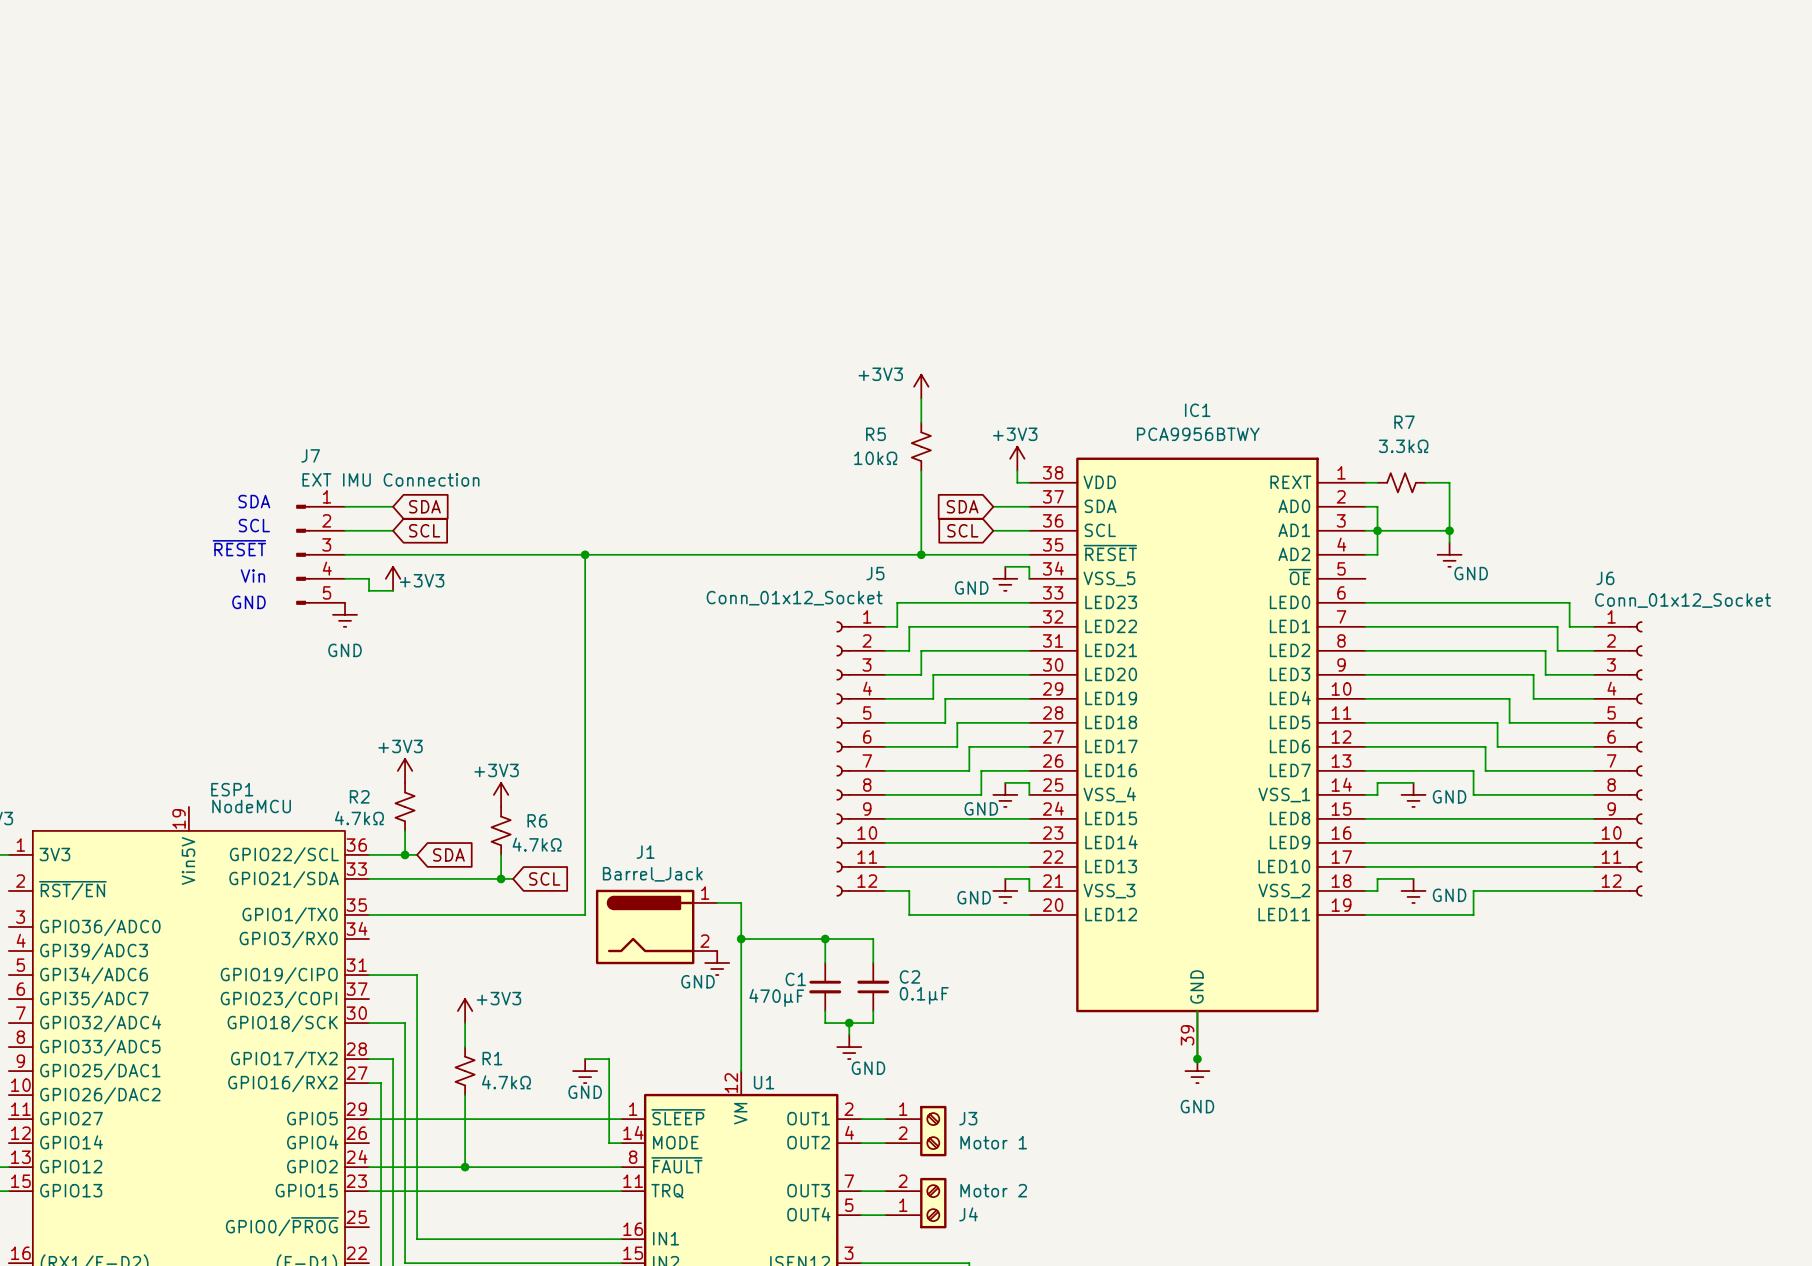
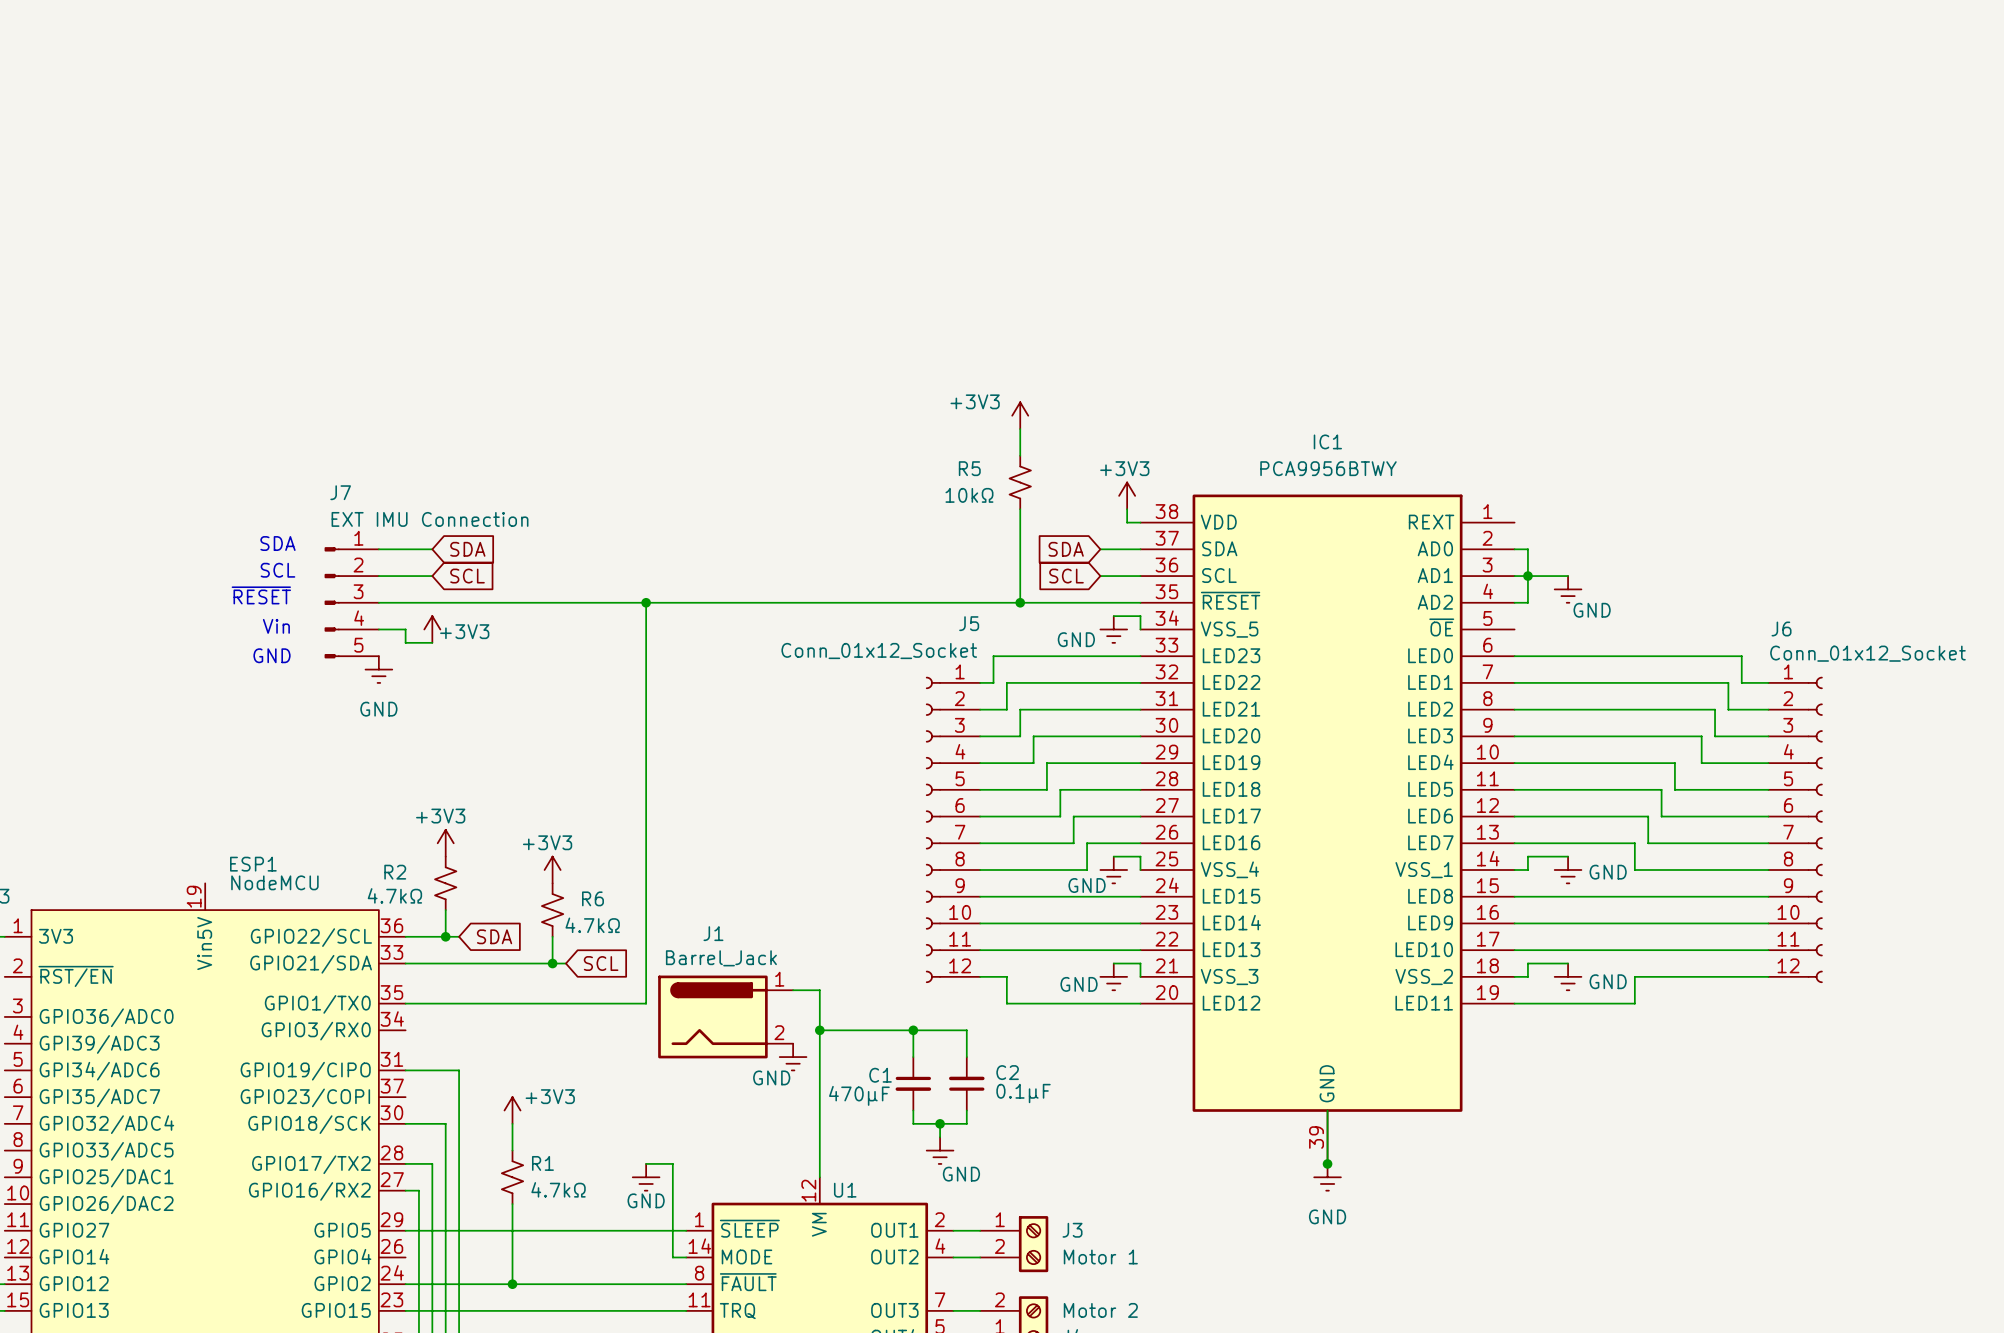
wire: (1365, 482) (1377, 482) -> none
R7: 3.3kΩ (1401, 482) -> none
wire: (1425, 482) (1449, 482) (1449, 542) -> none
wire: (1413, 530) (1449, 530) -> none
junction: (1449, 530) -> none
power symbol position: GND (1449, 554) -> GND (1568, 589)

